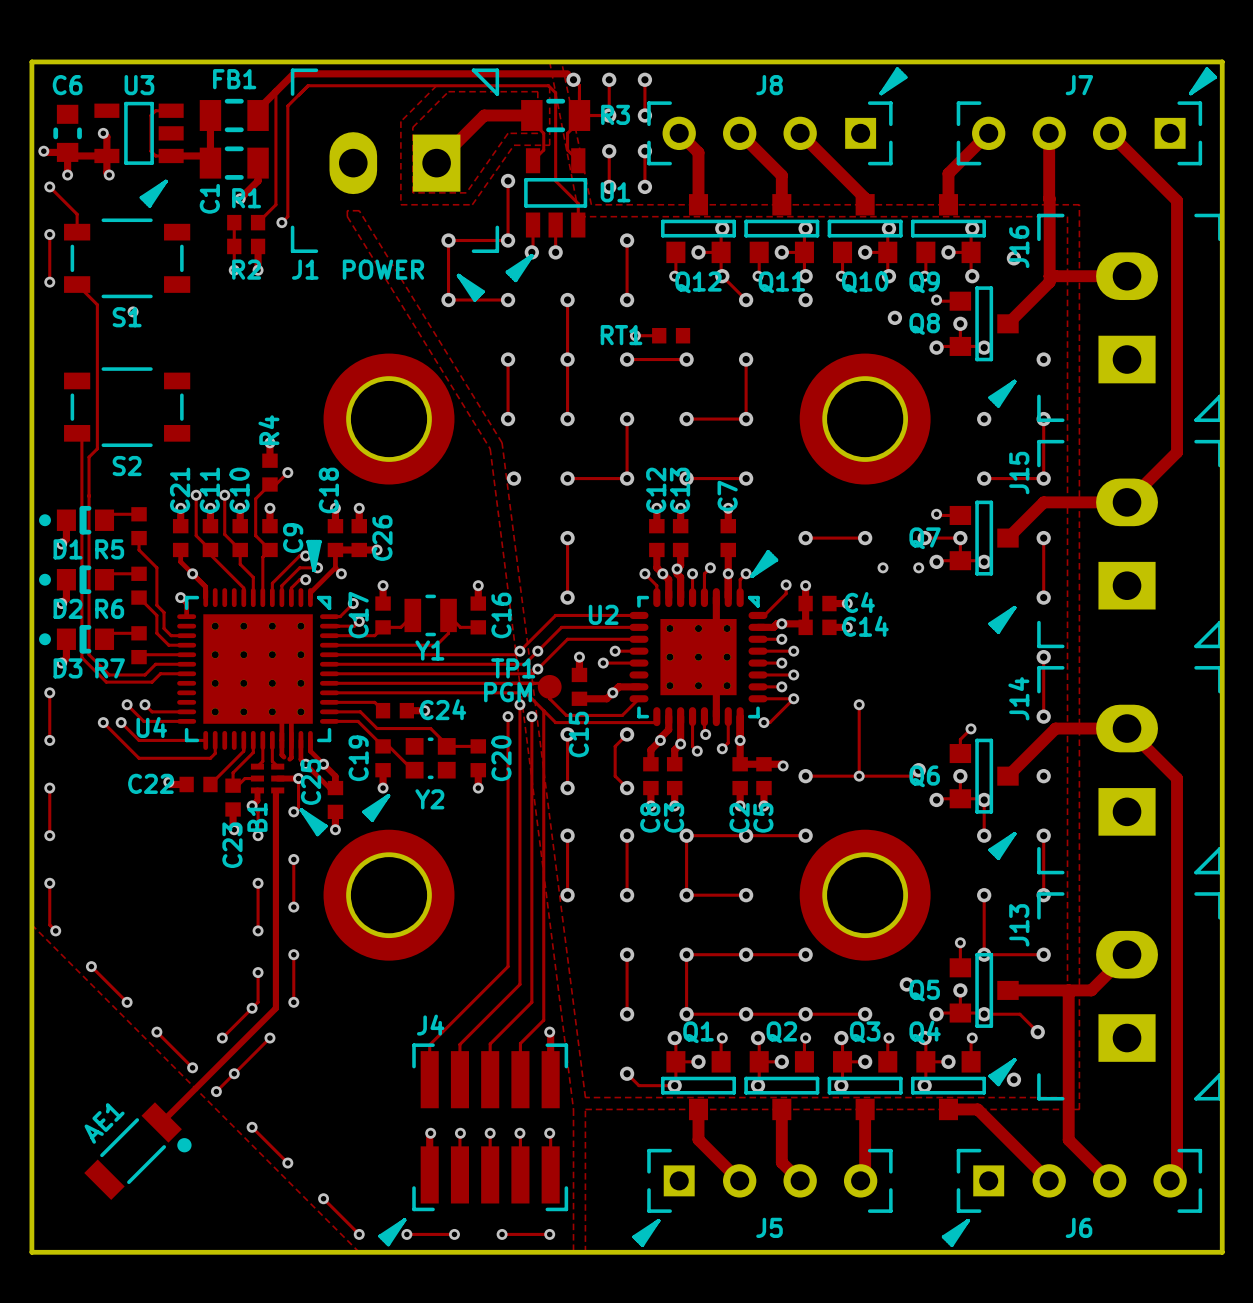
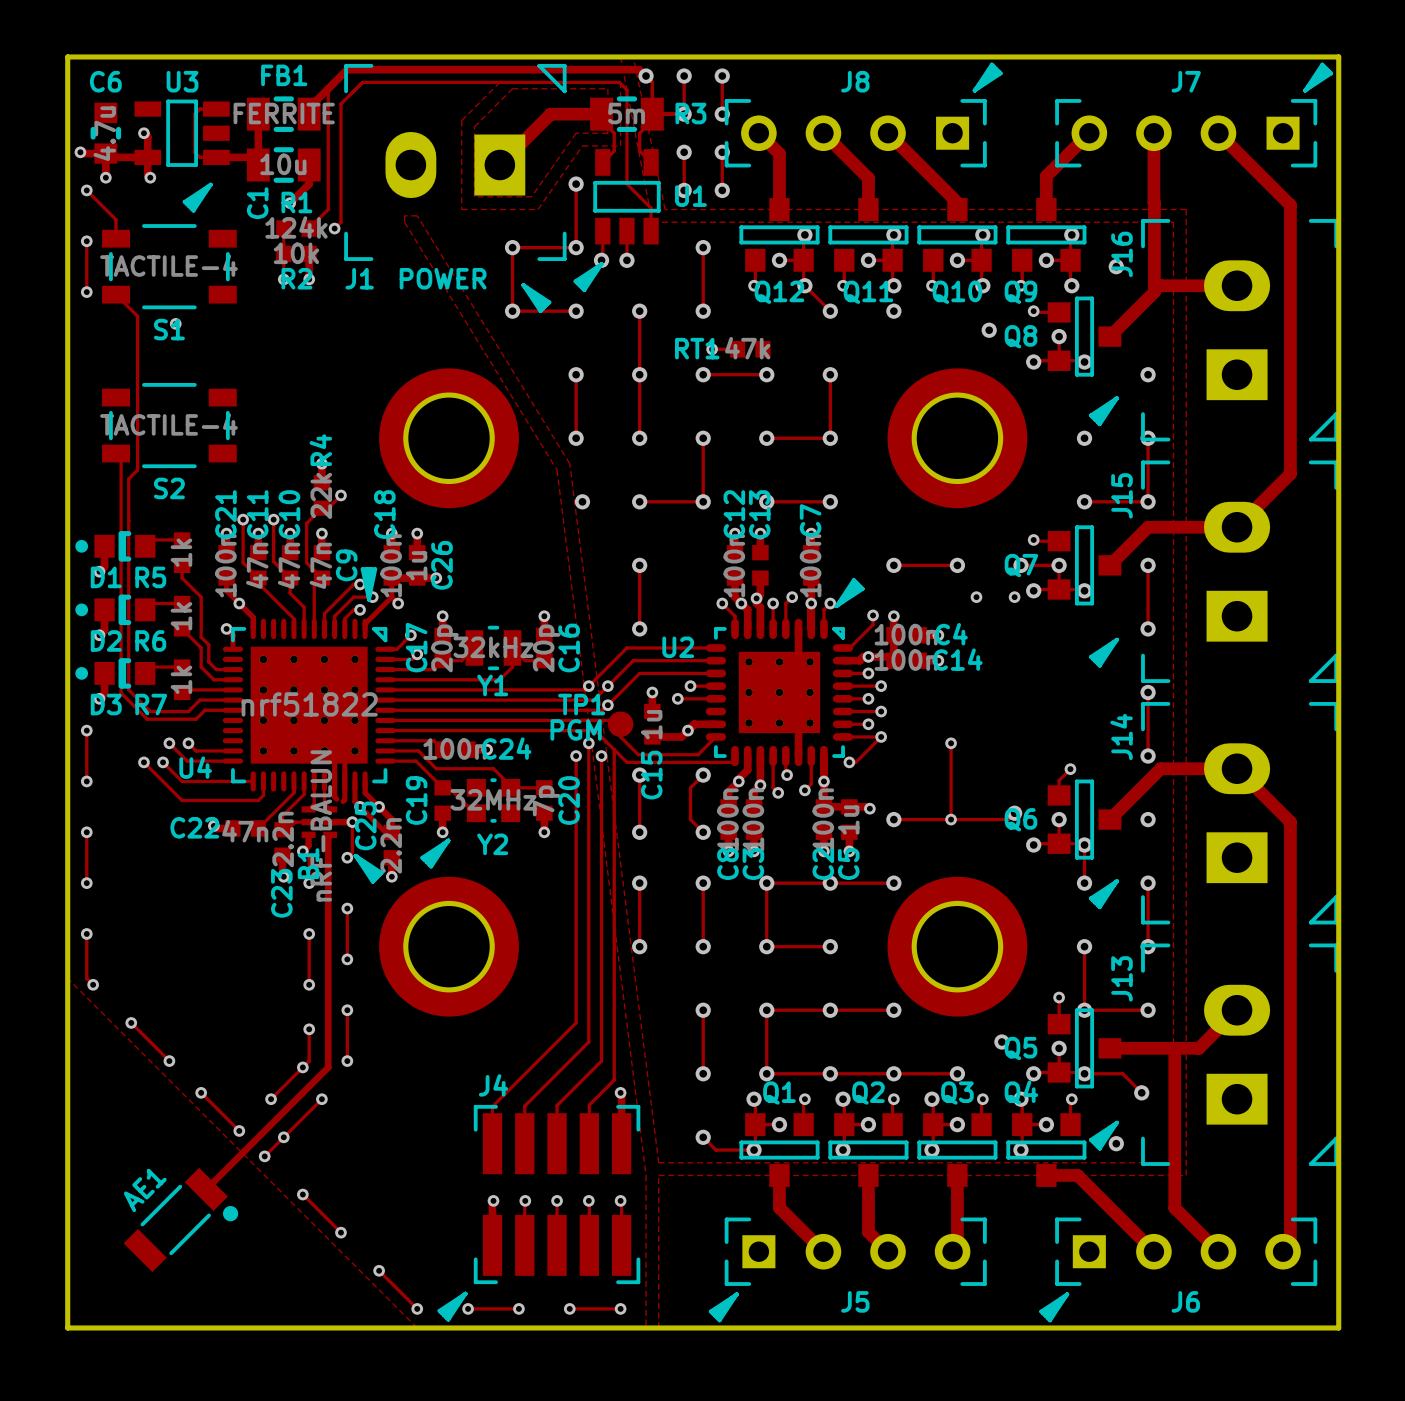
FB1 value: none -> FERRITE (284, 113)
R3 value: none -> 5m (626, 113)
C6 value: none -> 4.7u (104, 133)
C1 value: none -> 10u (283, 164)
R1 value: none -> 124k (296, 227)
R2 value: none -> 10k (296, 253)
S1 value: none -> TACTILE-4 (168, 265)
RT1 value: none -> 47k (747, 348)
S2 value: none -> TACTILE-4 (168, 424)
R4 value: none -> 22k (321, 495)
R5 value: none -> 1k (181, 552)
C21 value: none -> 100n (225, 565)
C11 value: none -> 47n (257, 565)
C10 value: none -> 47n (289, 565)
C9 value: none -> 47n (320, 565)
C18 value: none -> 100n (391, 565)
C26 value: none -> 1u (416, 565)
C12 value: none -> 100n (734, 565)
C7 value: none -> 100n (810, 565)
R6 value: none -> 1k (181, 616)
C4 value: none -> 100n (906, 634)
Y1 value: none -> 32kHz (493, 647)
C17 value: none -> 20p (444, 648)
C16 value: none -> 20p (546, 648)
C14 value: none -> 100n (906, 660)
R7 value: none -> 1k (181, 679)
U4 value: none -> nrf51822 (309, 704)
C15 value: none -> 1u (651, 724)
C24 value: none -> 100n (454, 749)
Y2 value: none -> 32MHz (493, 799)
C20 value: none -> 7p (546, 800)
C8 value: none -> 100n (727, 820)
C3 value: none -> 100n (753, 820)
C2 value: none -> 100n (823, 820)
C5 value: none -> 1u (848, 820)
B1 value: none -> nRF-BALUN (321, 825)
C22 value: none -> 47n (245, 831)
C23 value: none -> 2.2n (283, 839)
C25 value: none -> 2.2n (391, 845)

